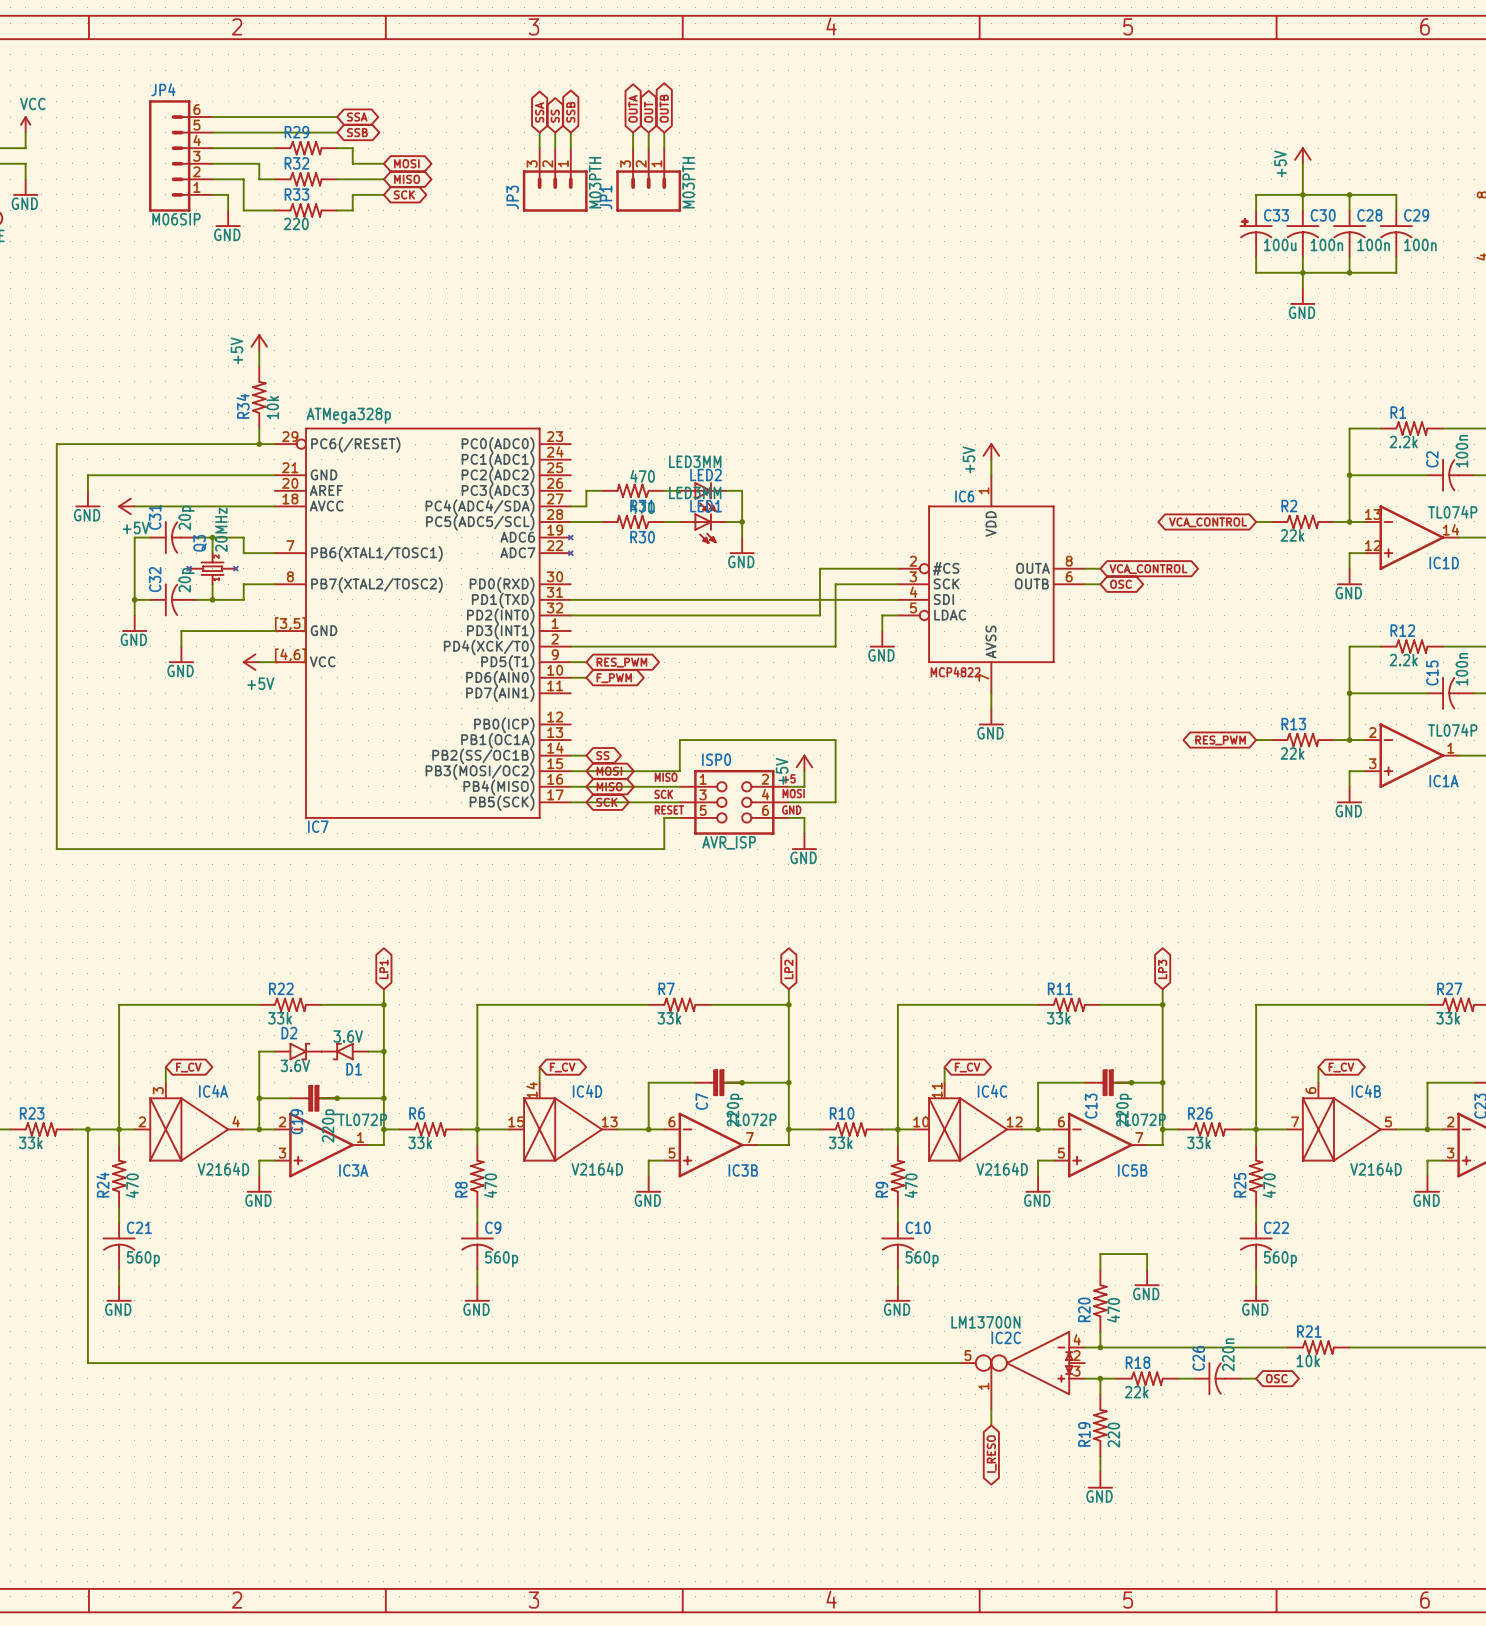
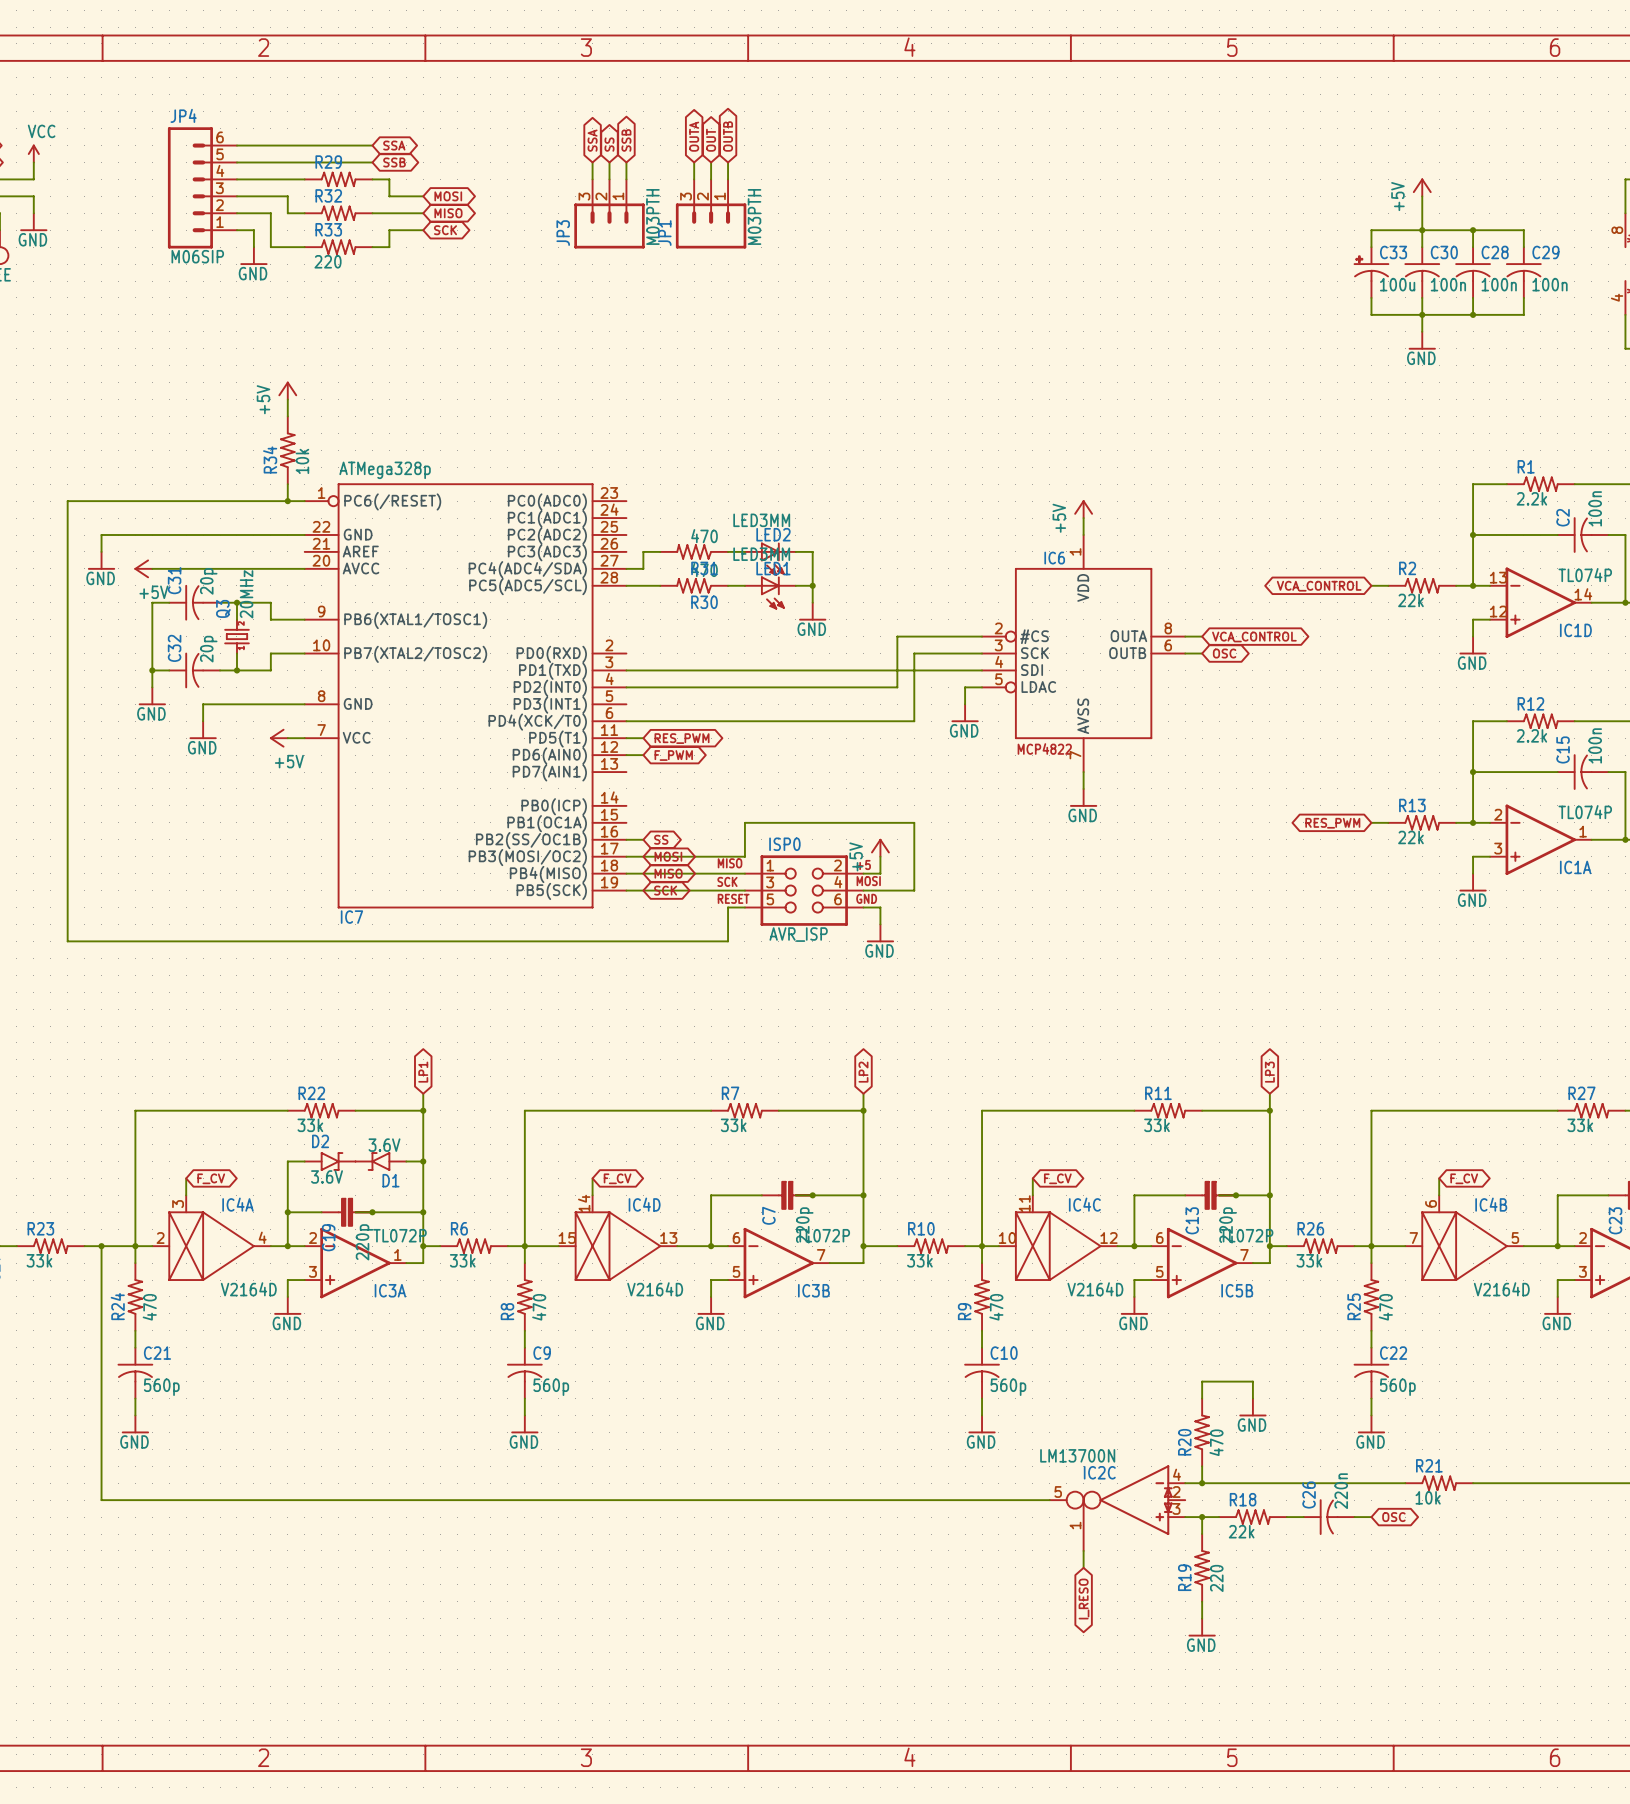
IC7 symbol: [274, 427, 573, 819] -> [304, 483, 627, 909]
Q3 symbol: [187, 552, 238, 585] -> [224, 619, 250, 655]

